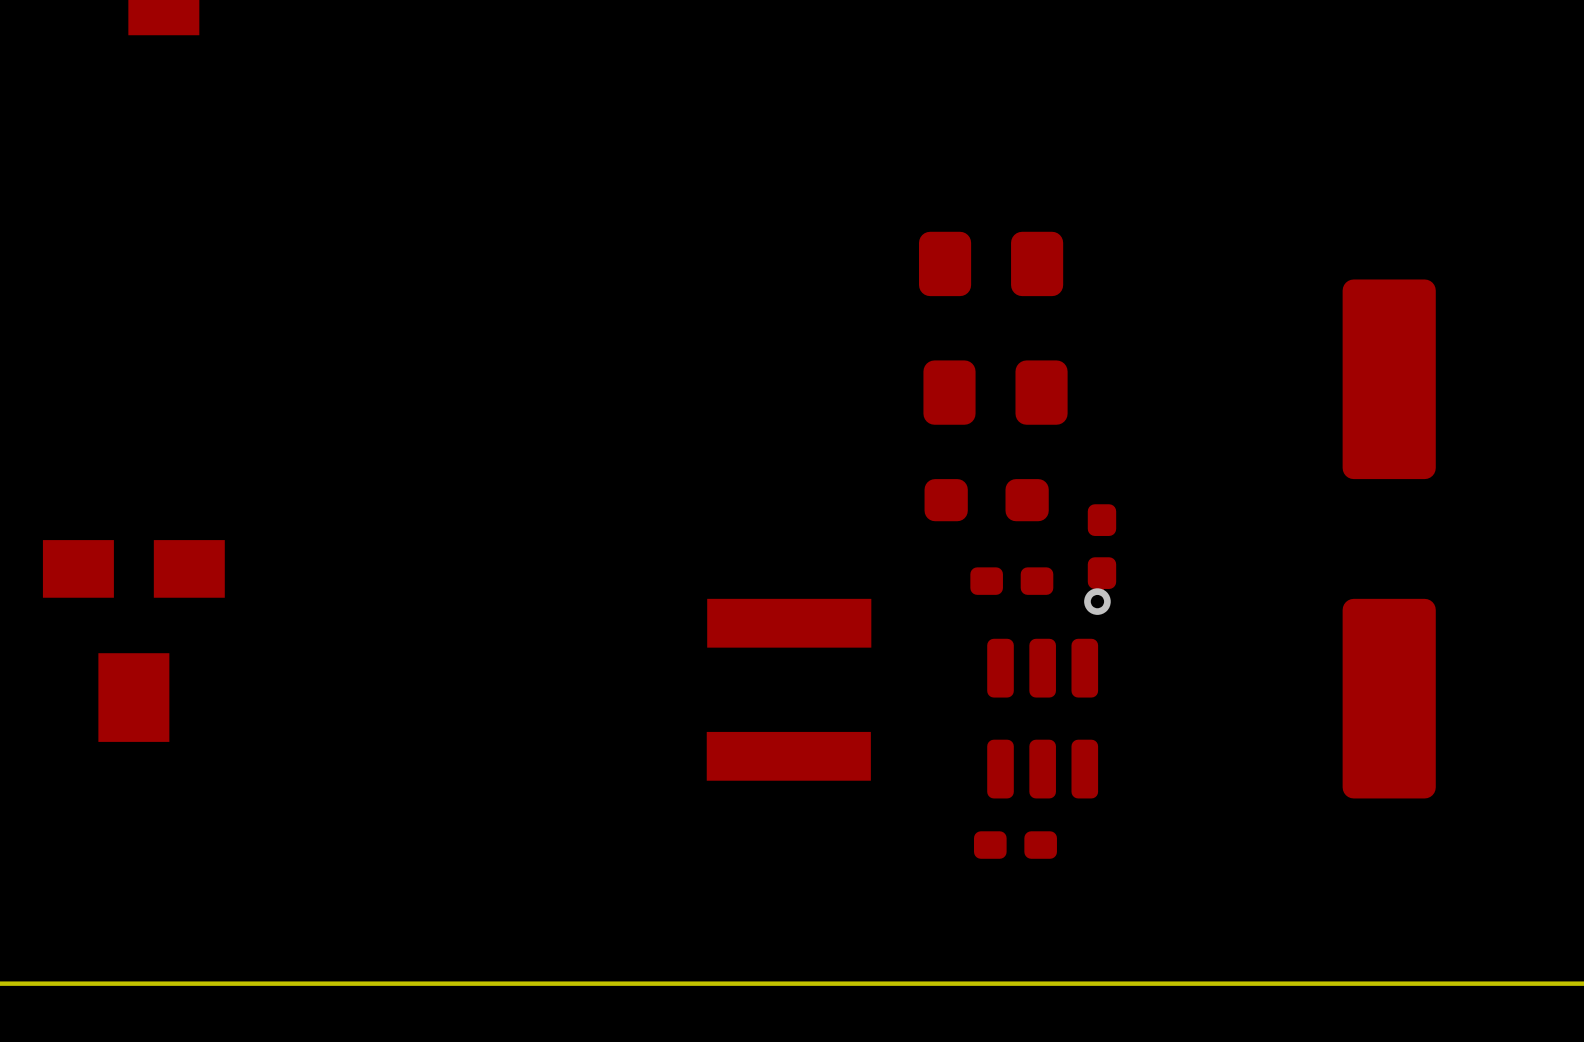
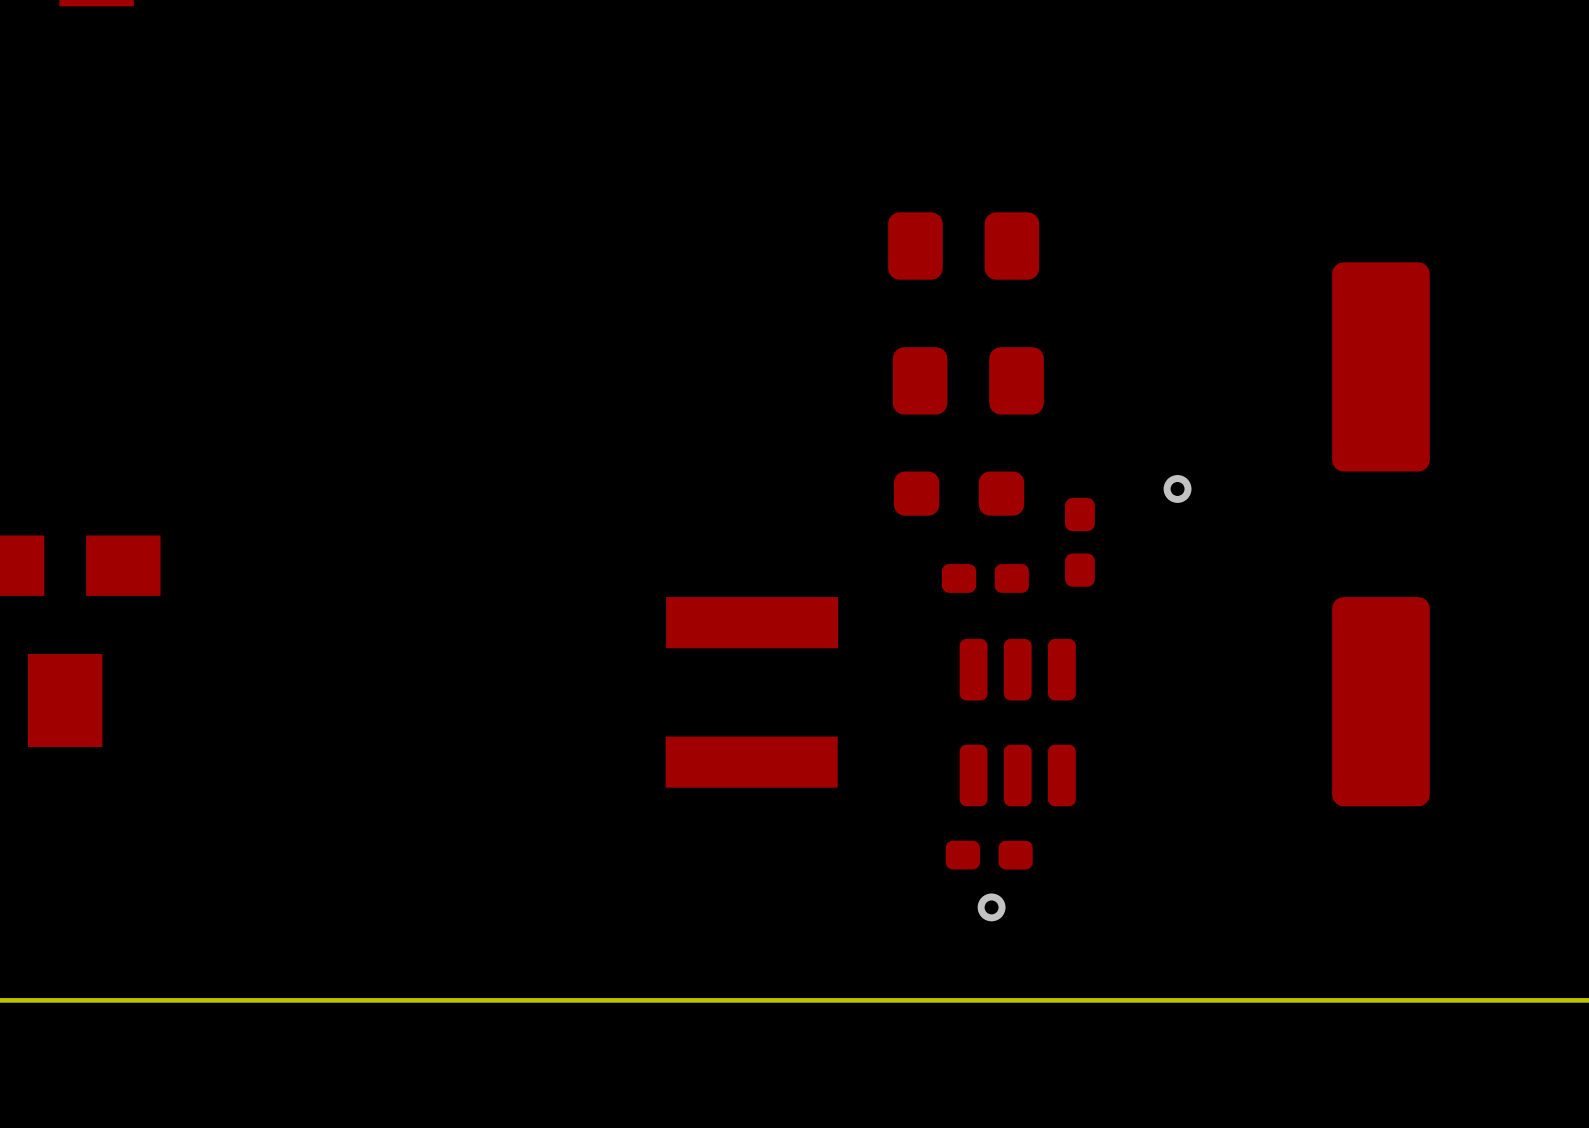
via position: (1097, 601) -> (1177, 488)
via: none -> (991, 907)

